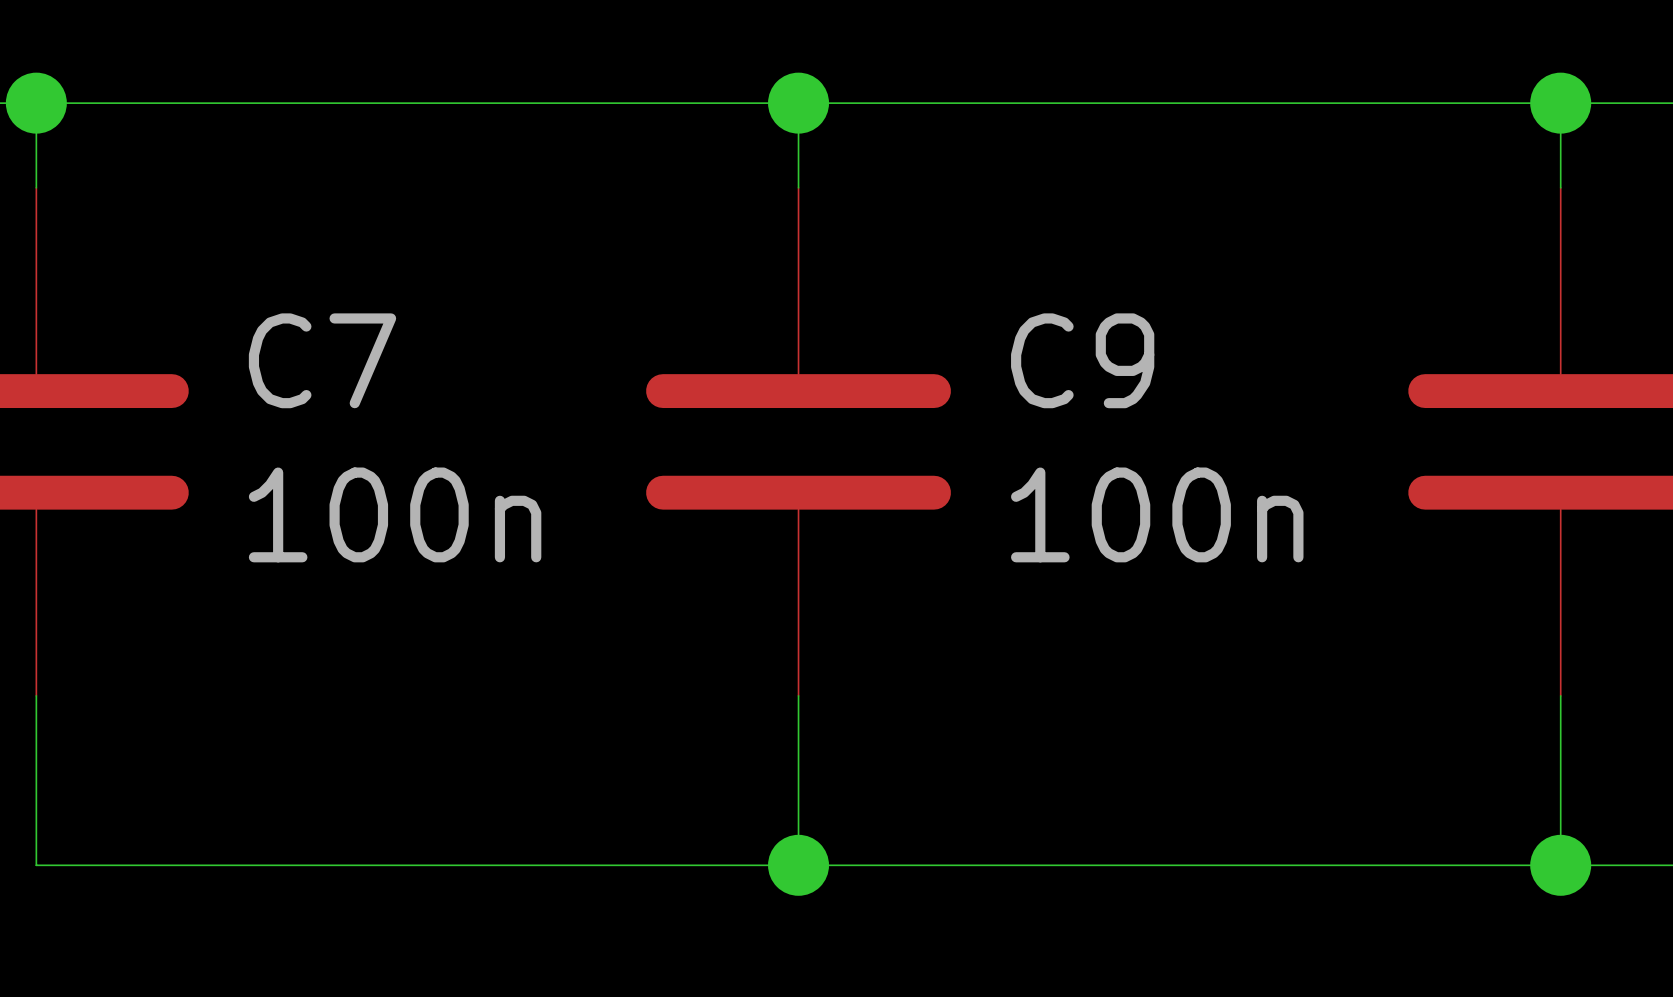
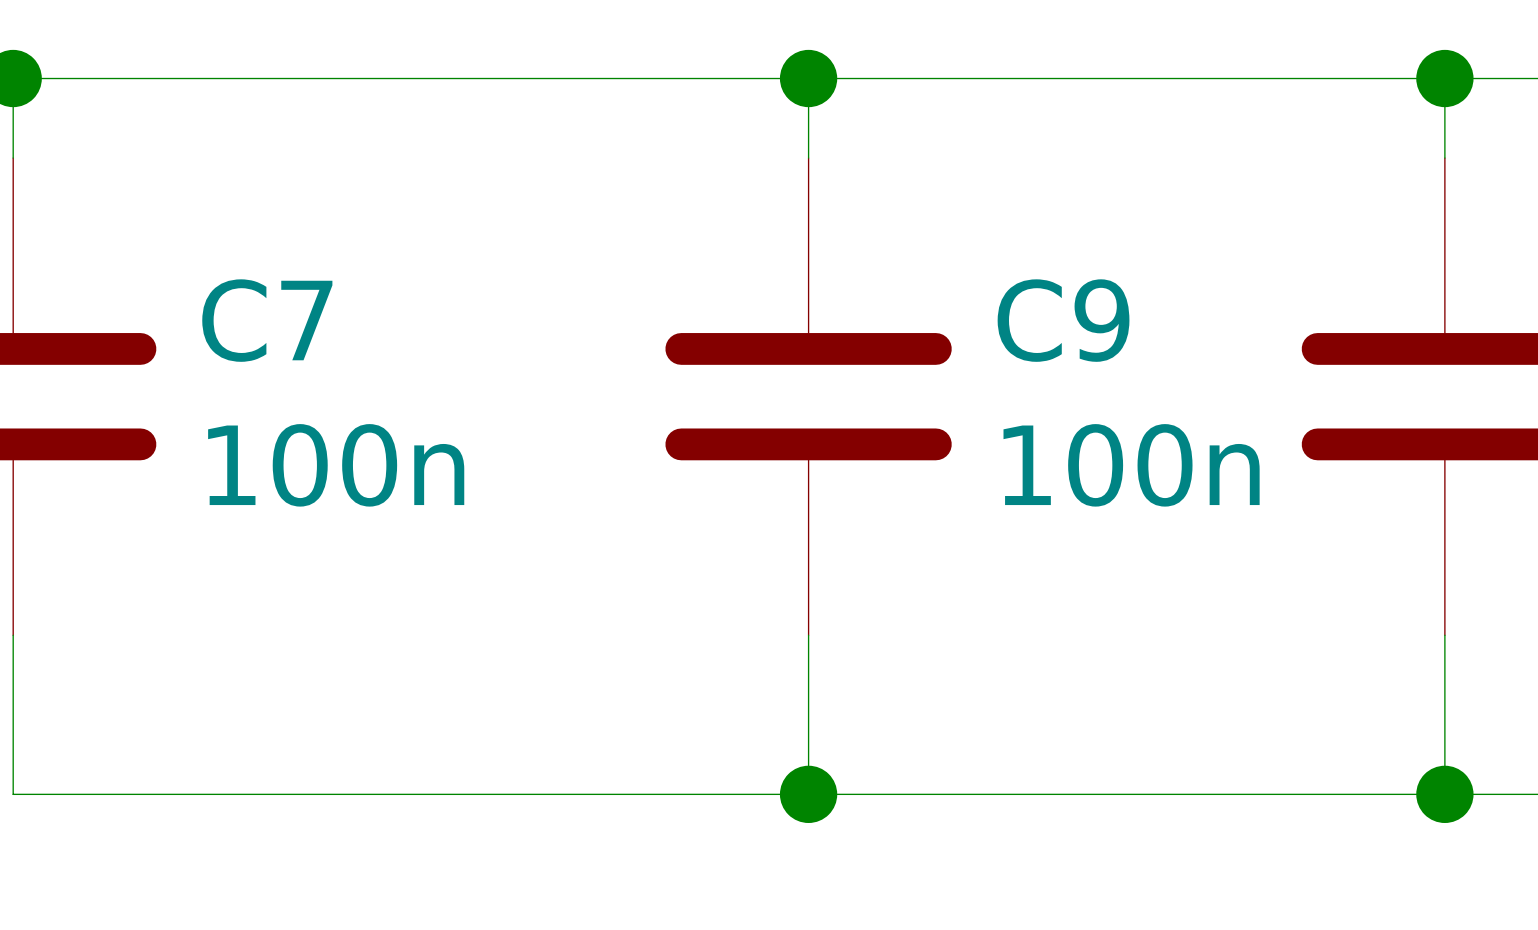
wire: (798, 103) (798, 187) -> (808, 78) (808, 158)
junction position: (798, 103) -> (808, 78)
C9 position: (798, 441) -> (808, 396)
wire: (798, 695) (798, 865) -> (808, 635) (808, 794)
junction position: (798, 865) -> (808, 794)

